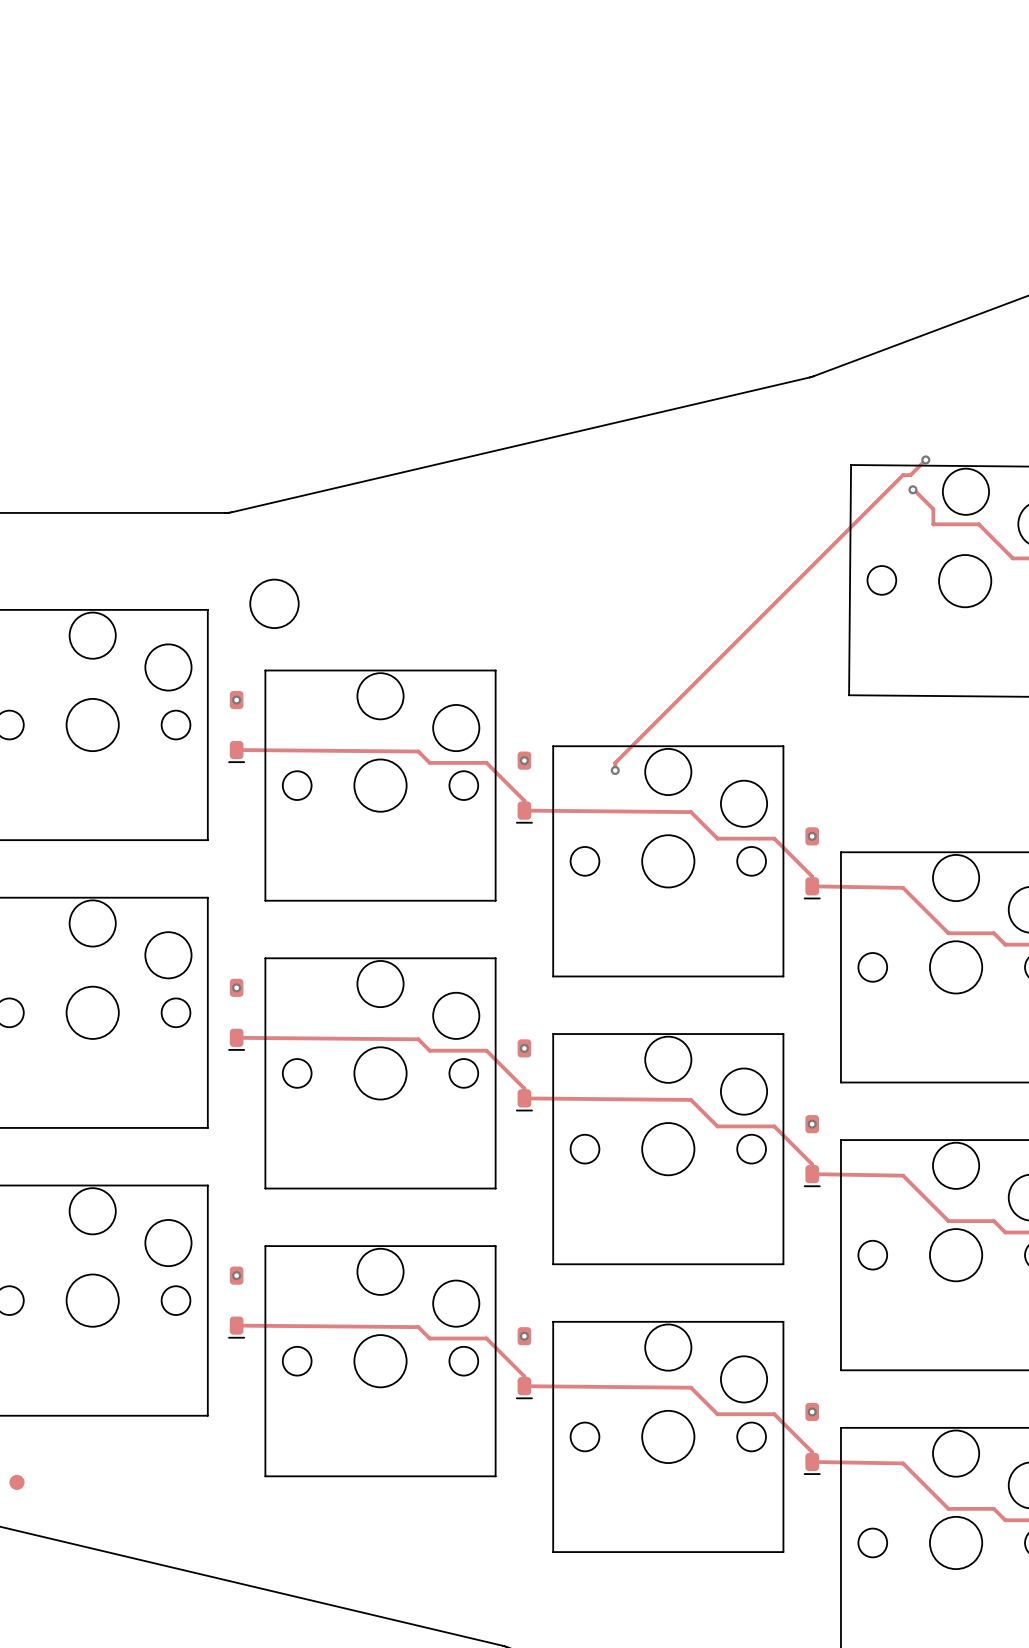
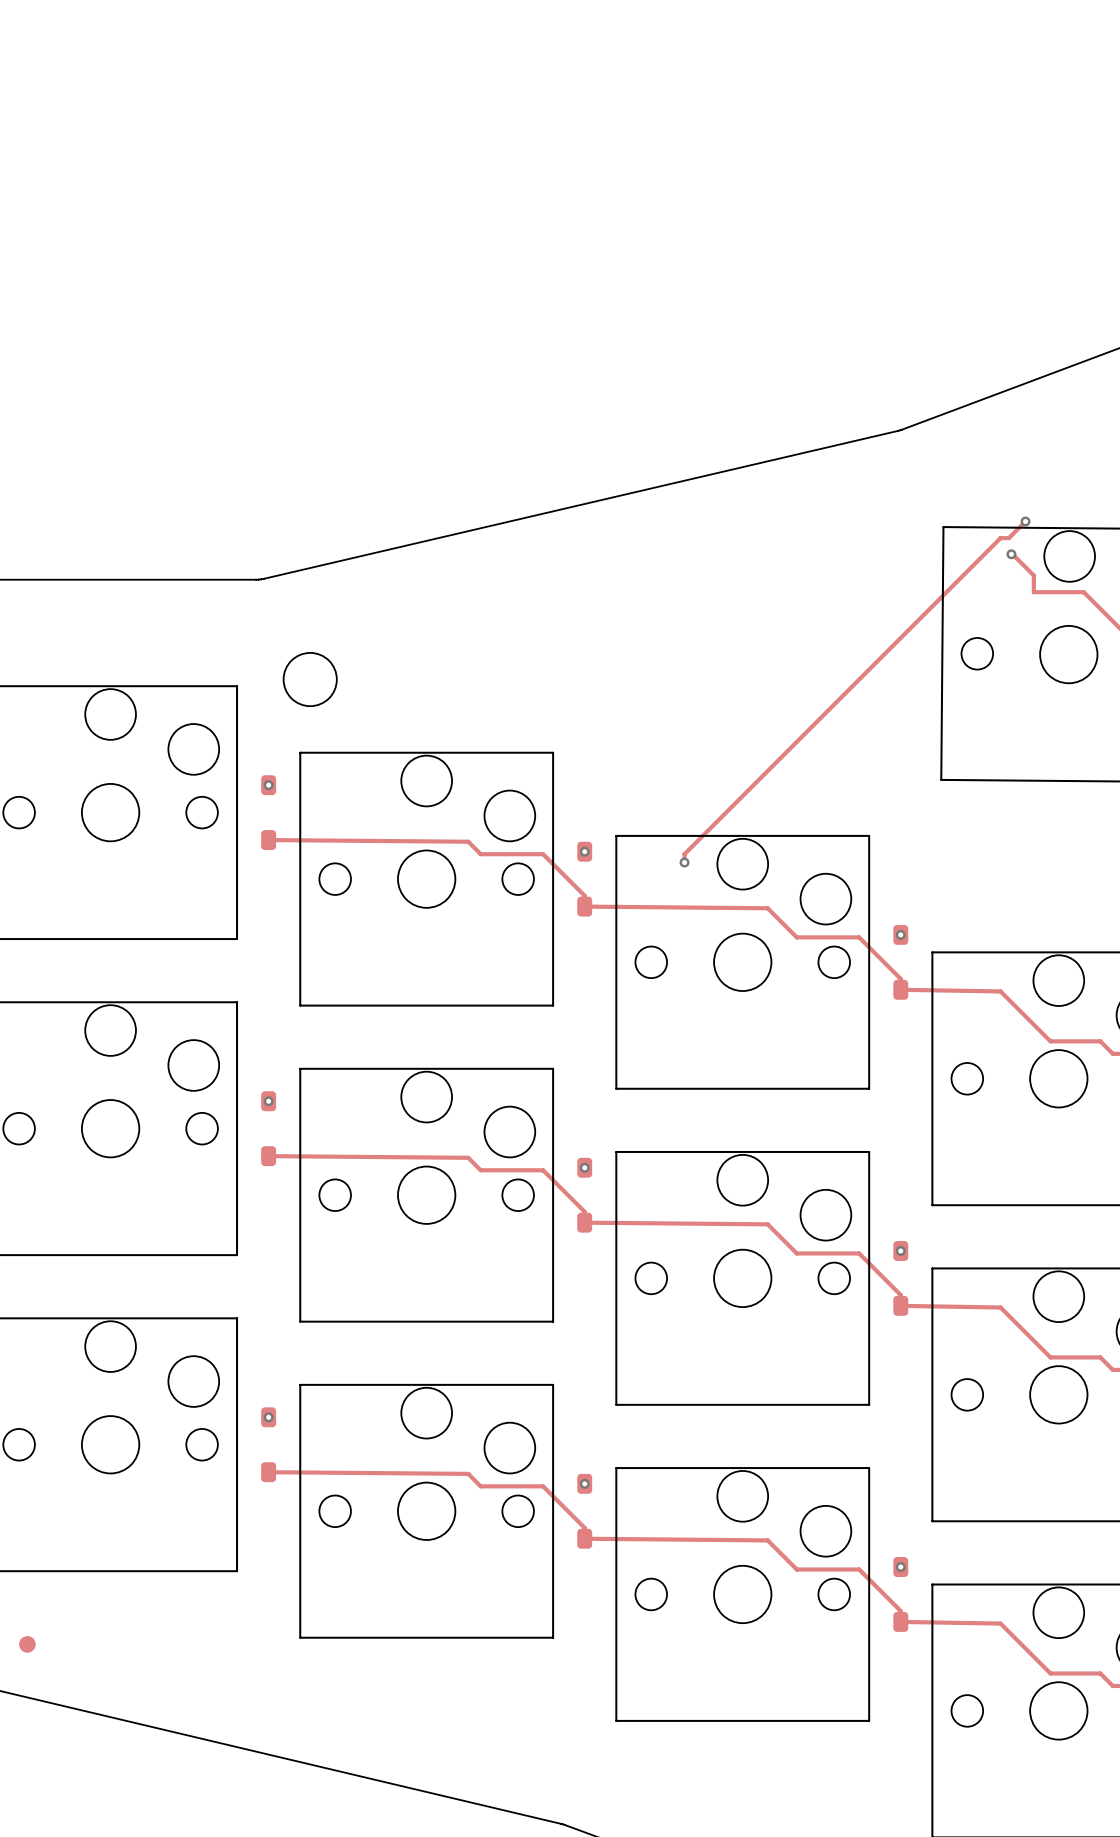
part footprint: [228, 690, 246, 764] -> [261, 775, 277, 851]
part footprint: [515, 751, 533, 824] -> [577, 841, 593, 917]
part footprint: [803, 827, 821, 900] -> [893, 924, 909, 1000]
part footprint: [228, 978, 246, 1051] -> [261, 1091, 277, 1167]
part footprint: [515, 1039, 533, 1112] -> [577, 1157, 593, 1233]
part footprint: [803, 1115, 821, 1188] -> [893, 1240, 909, 1316]
part footprint: [228, 1266, 246, 1339] -> [261, 1407, 277, 1483]
part footprint: [515, 1327, 533, 1400] -> [577, 1473, 593, 1549]
part footprint: [803, 1402, 821, 1475] -> [893, 1557, 909, 1632]

